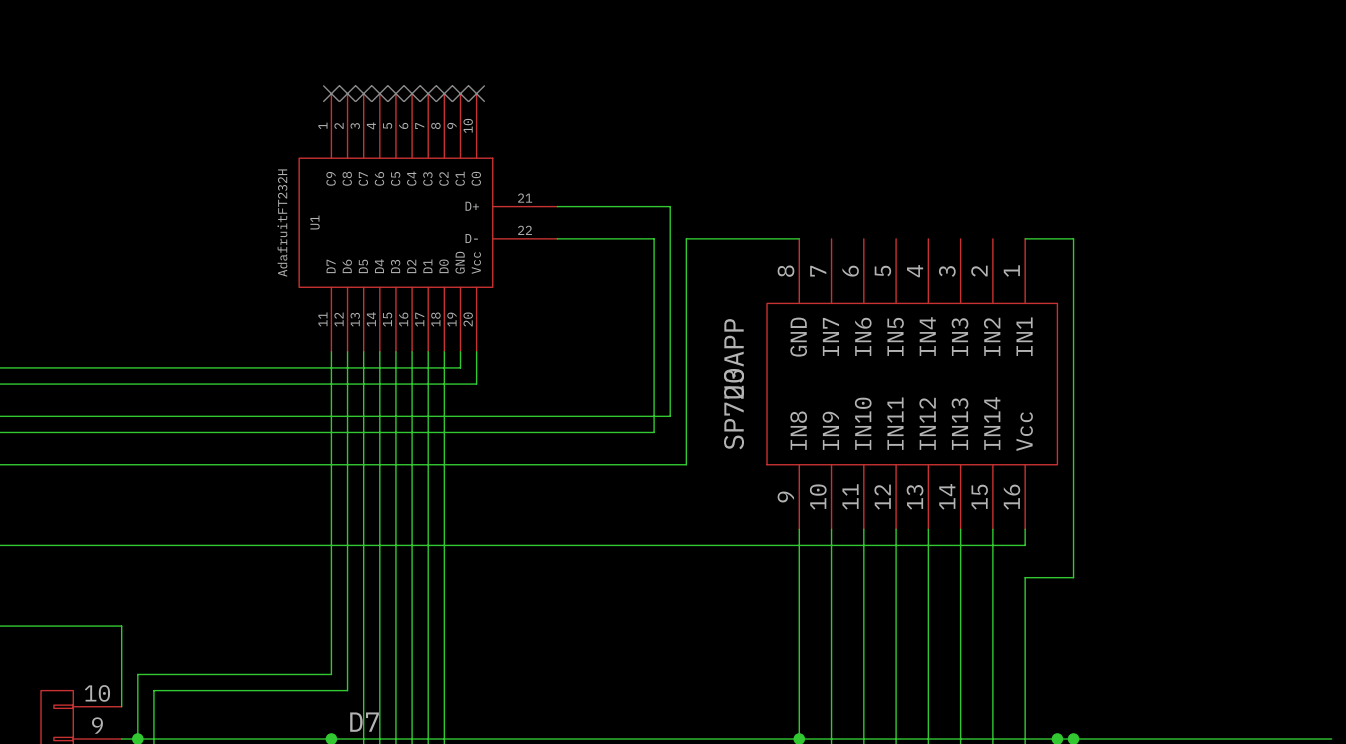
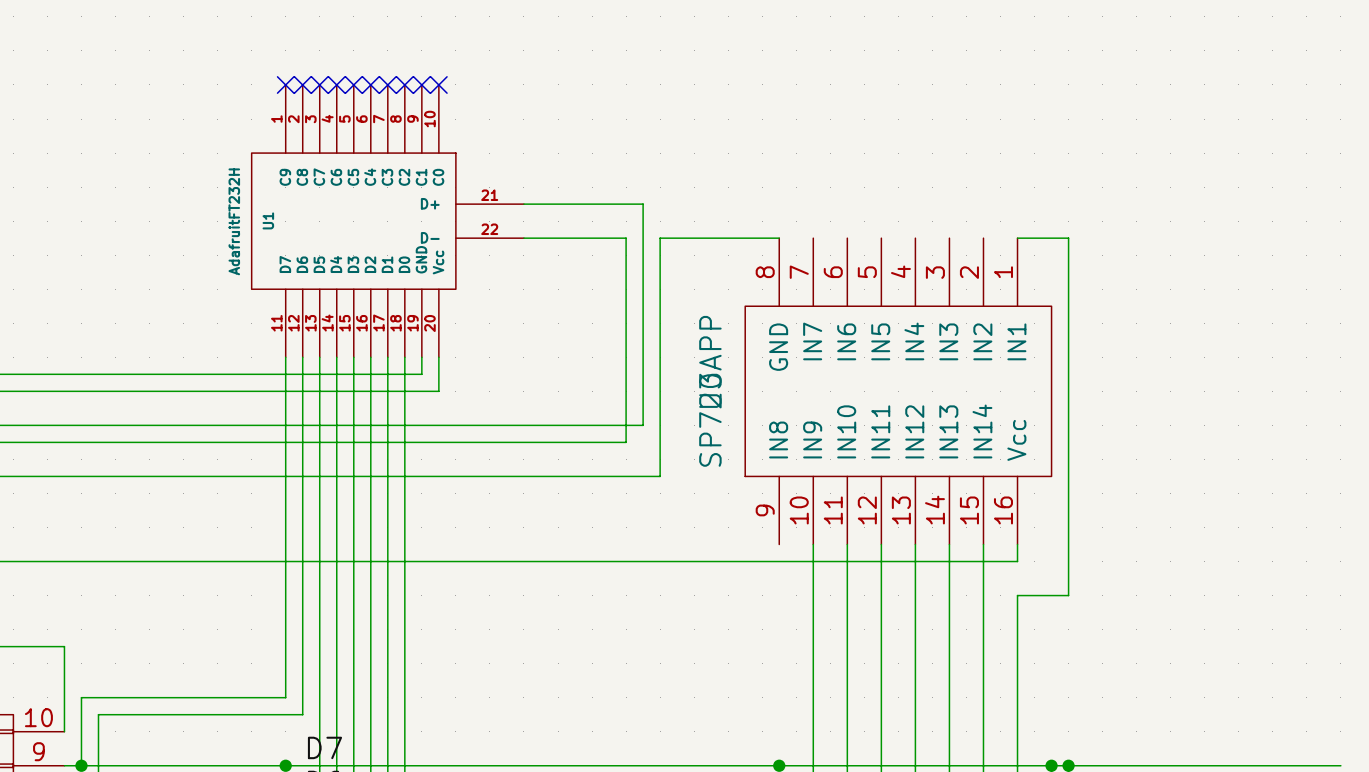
wire: (799, 529) (799, 739) -> none

